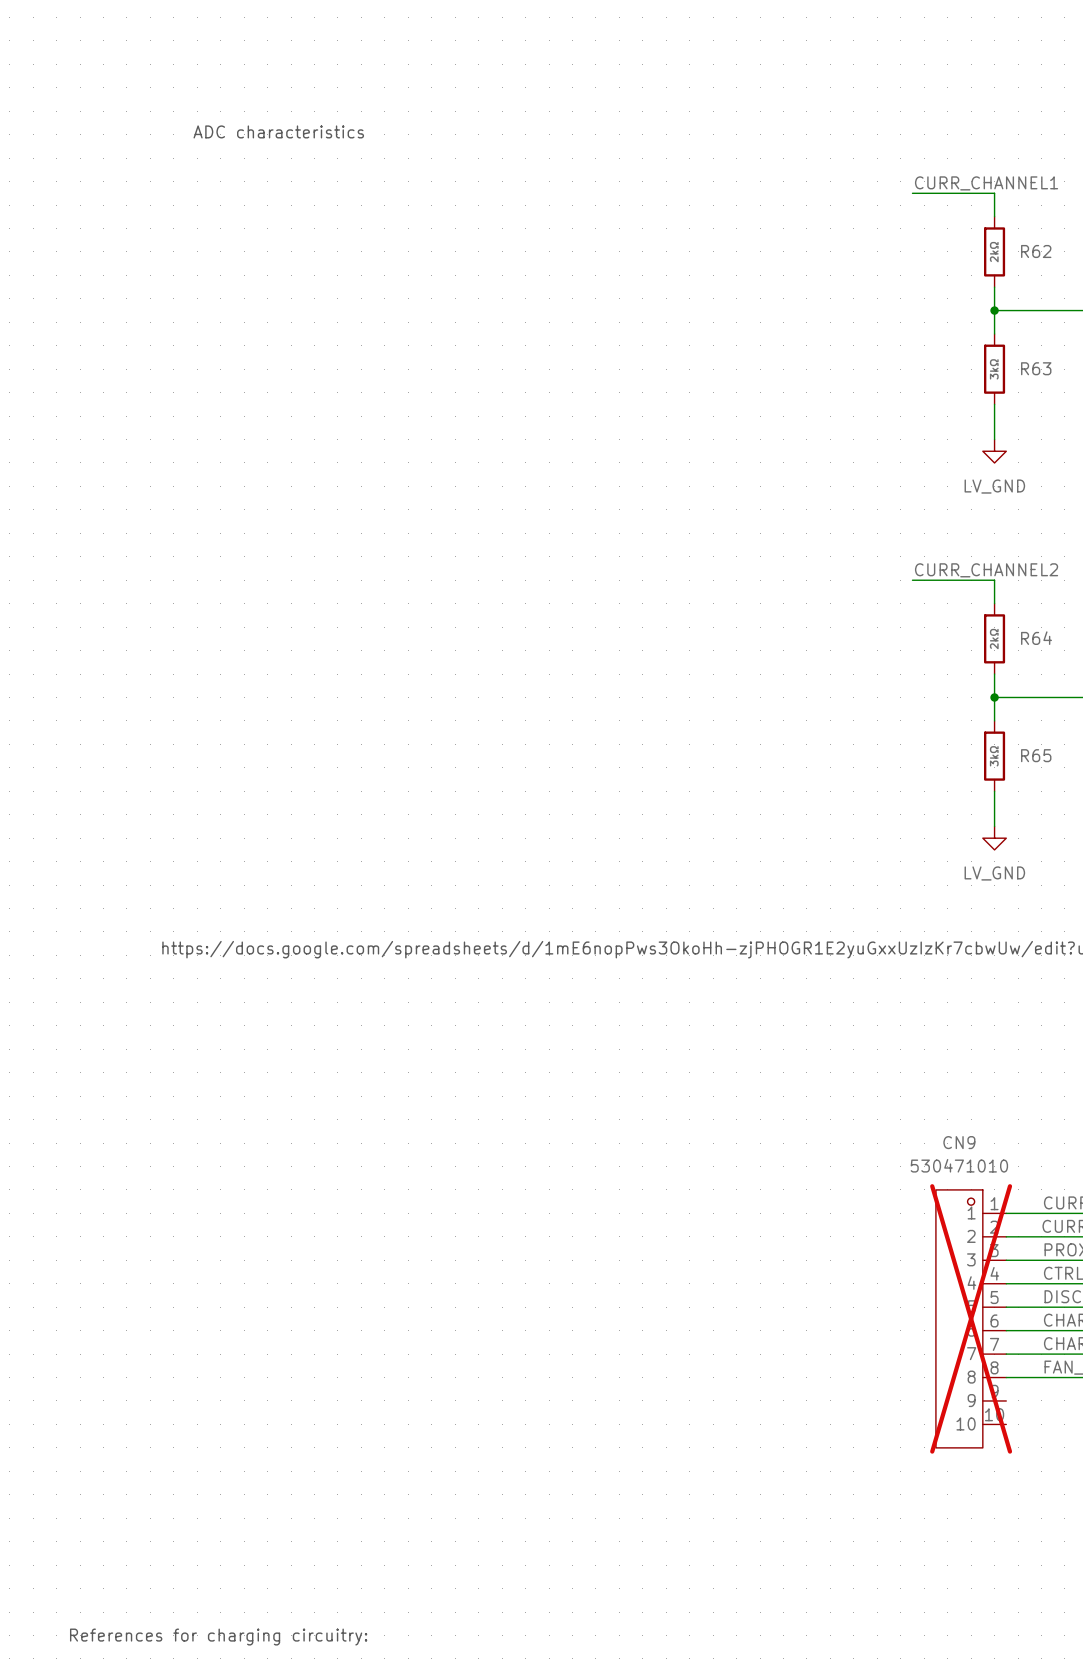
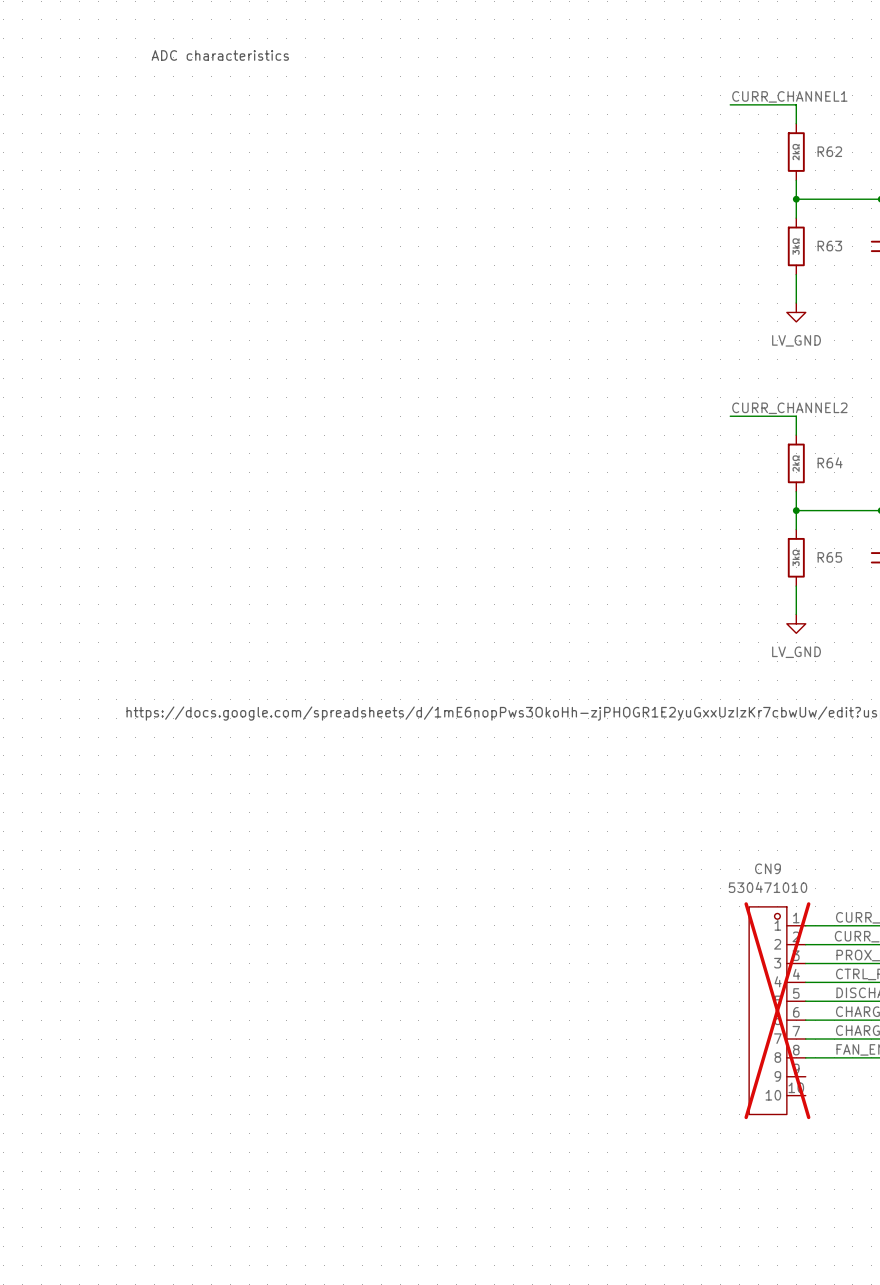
text: References for charging circuitry: (218, 1637) -> none

